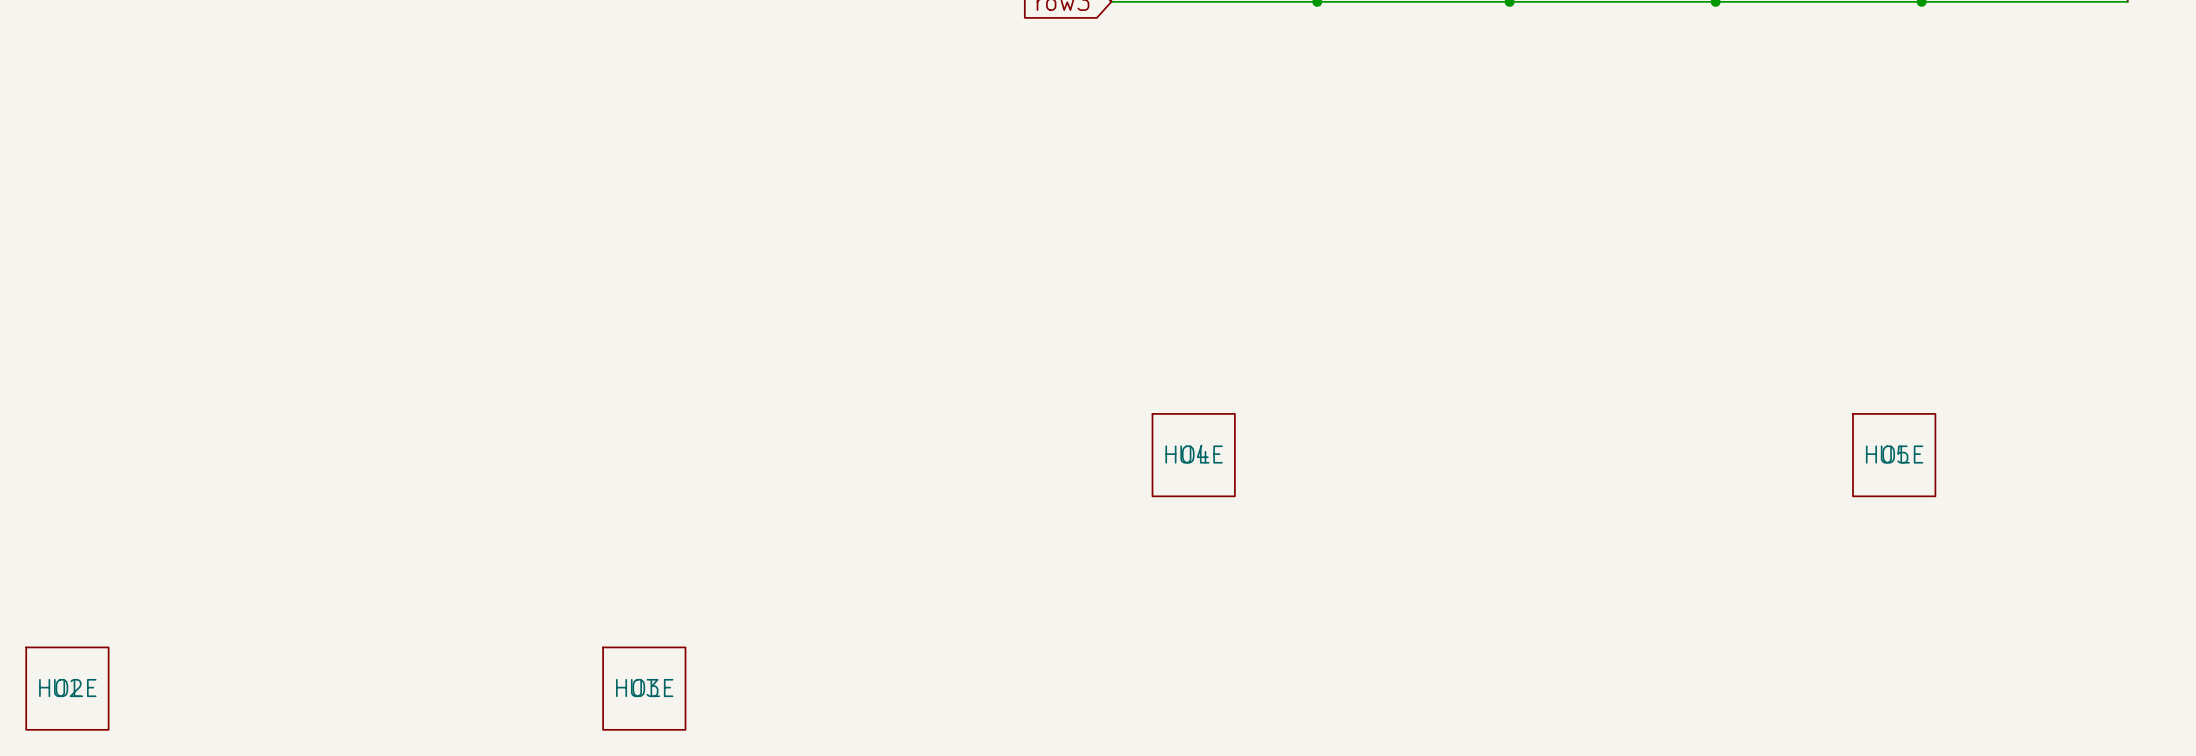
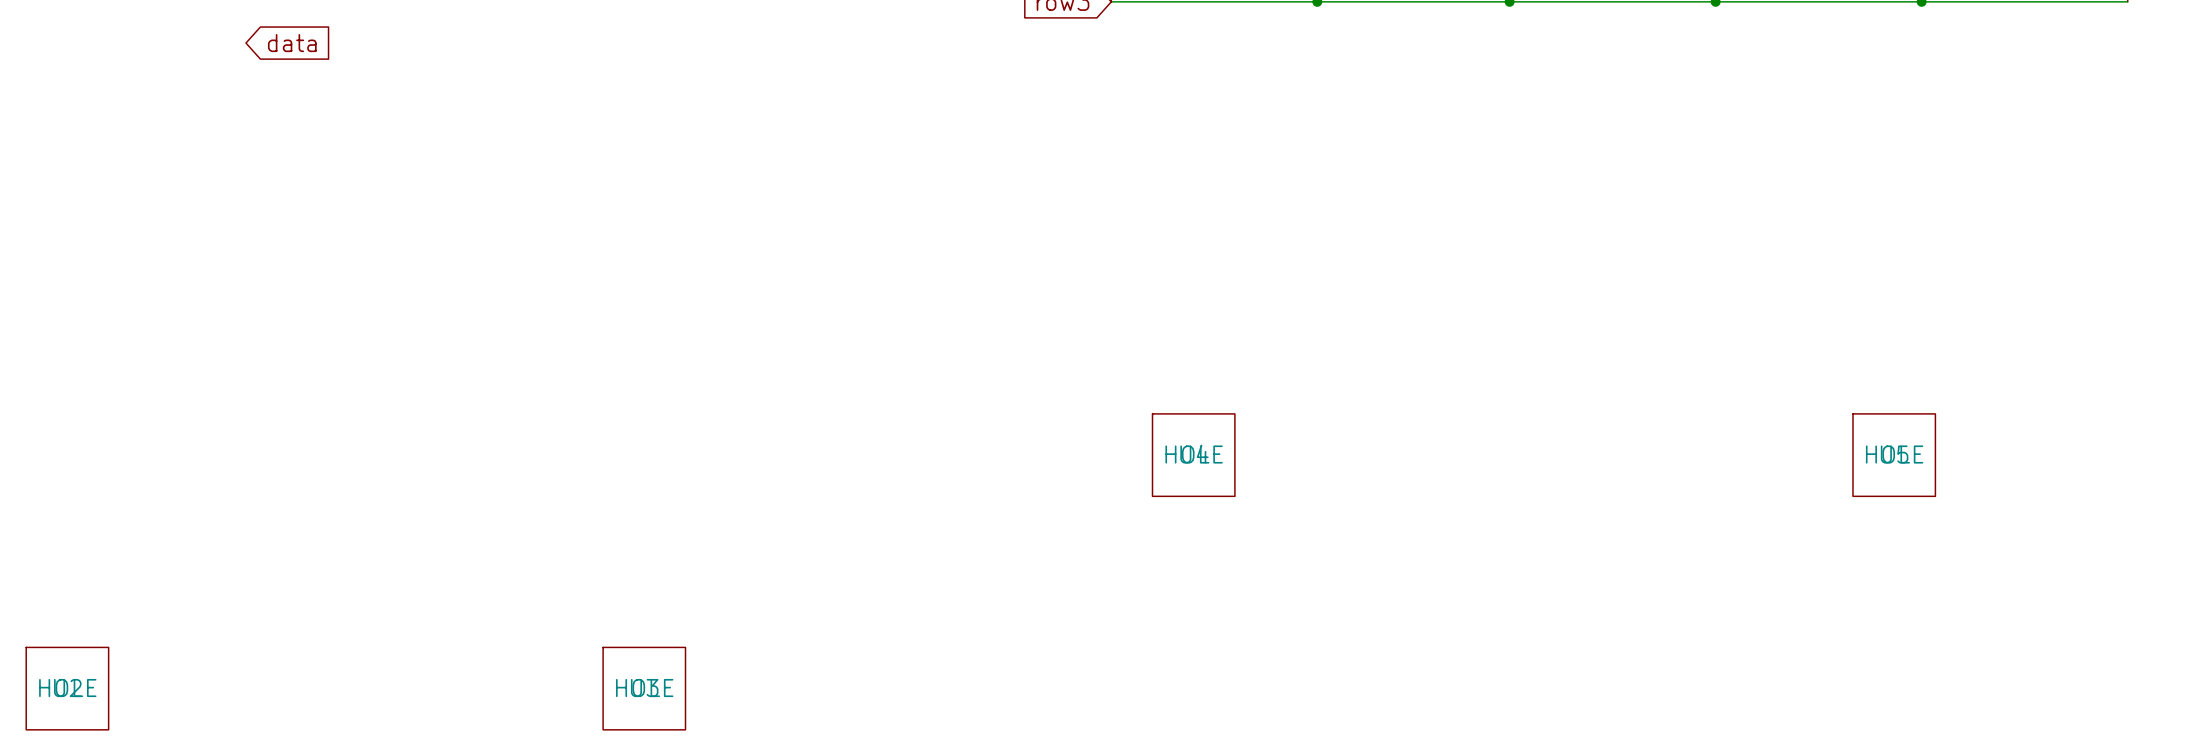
global label: none -> data (292, 43)

